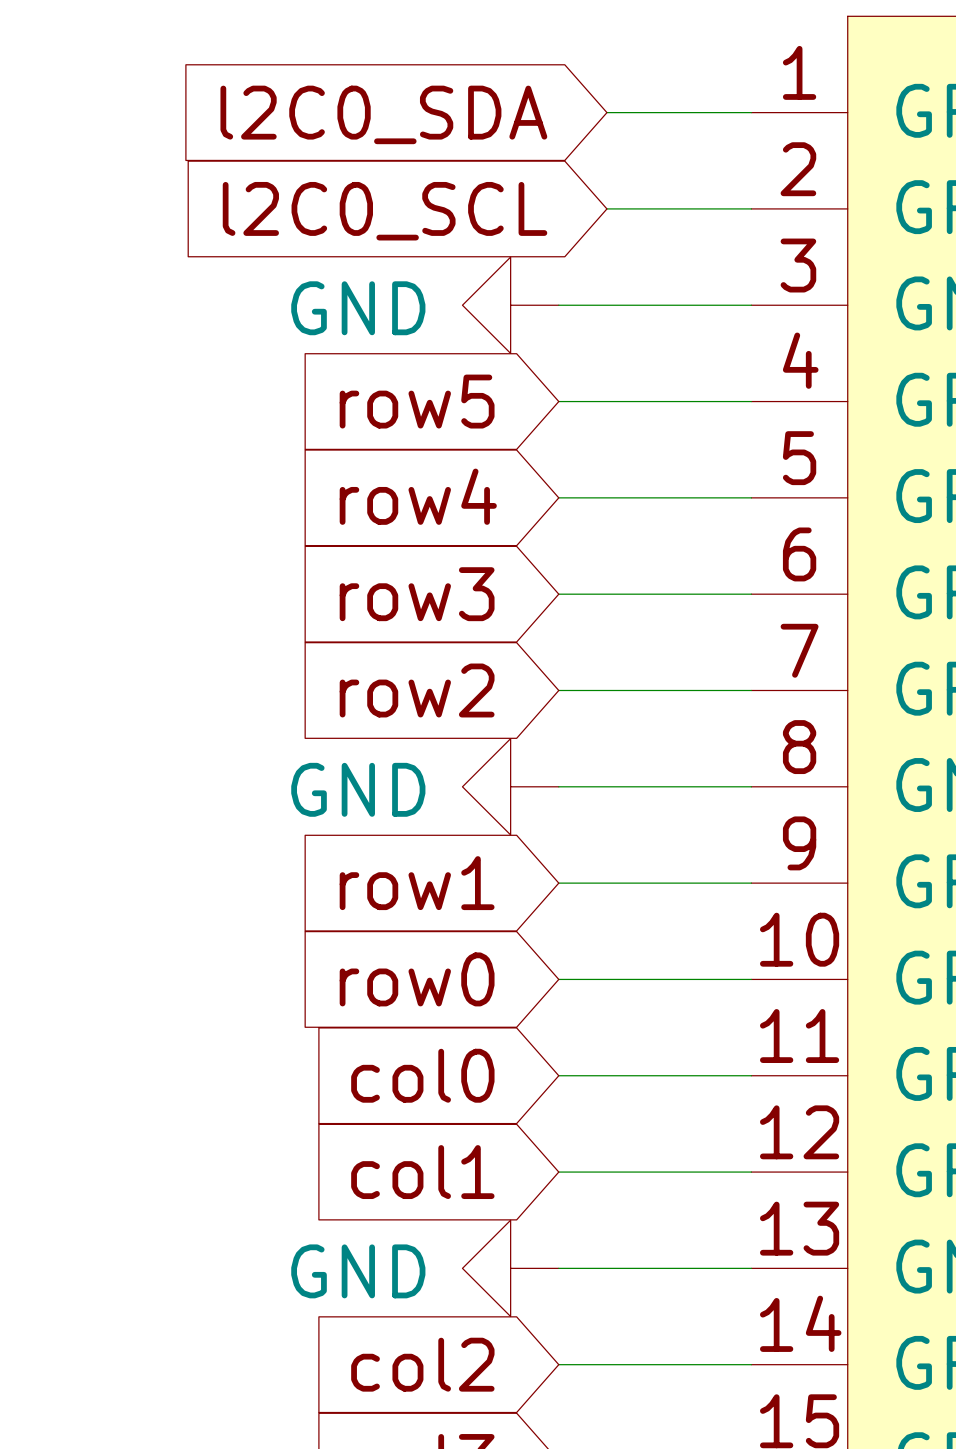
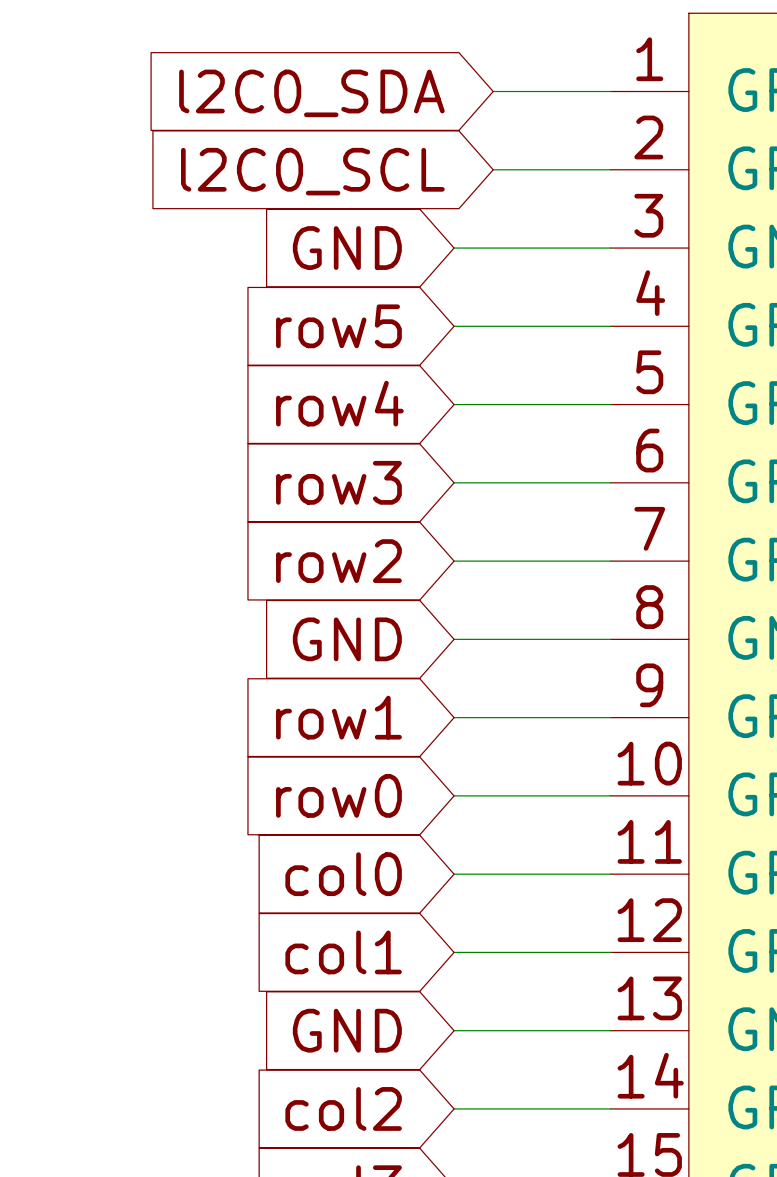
global label: none -> GND (347, 248)
power symbol: GND (510, 305) -> none
global label: none -> GND (347, 639)
power symbol: GND (510, 786) -> none
global label: none -> GND (347, 1030)
power symbol: GND (510, 1268) -> none

